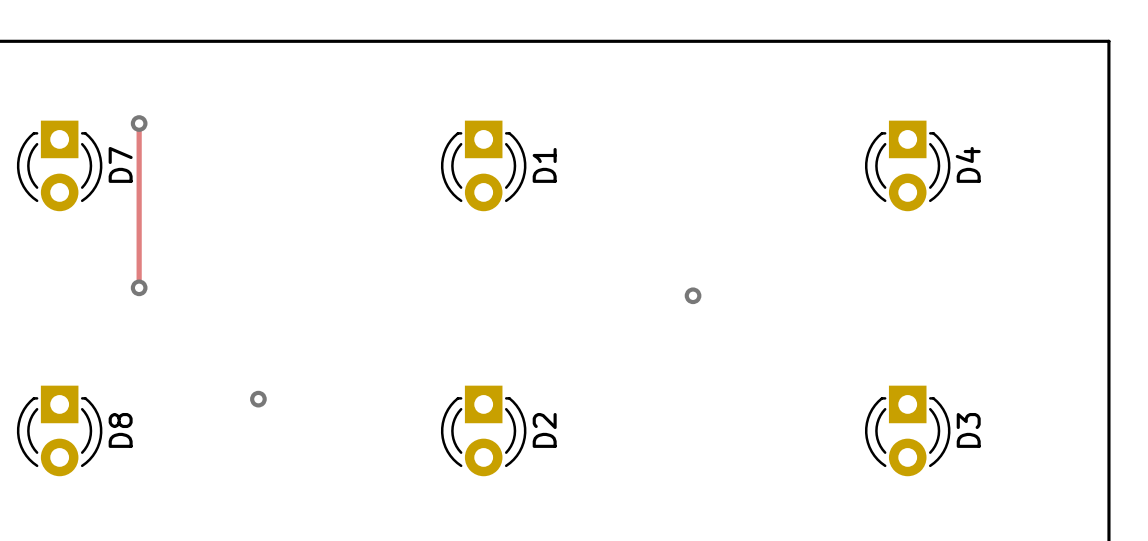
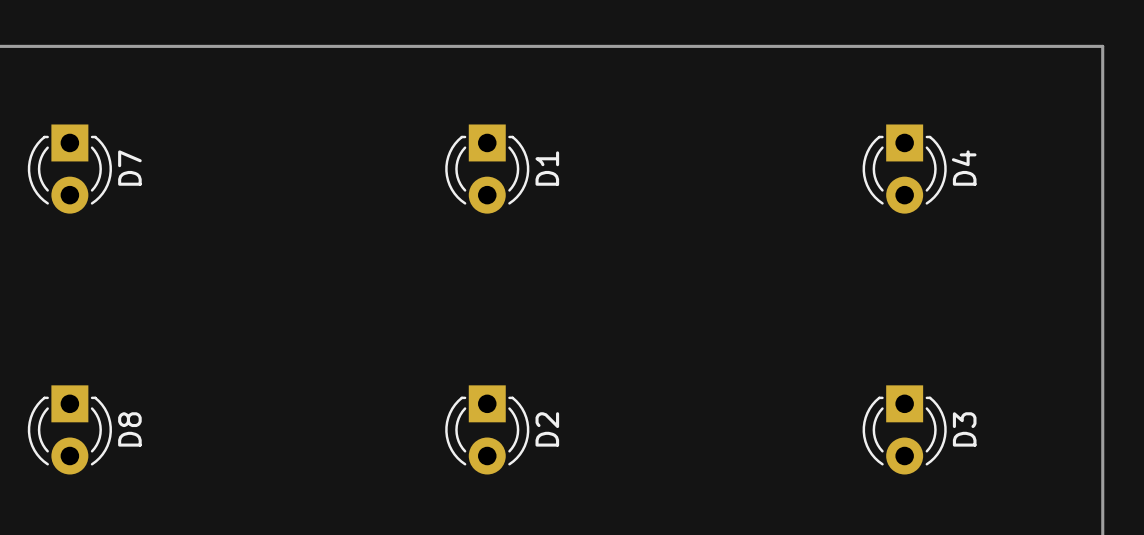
track: (139, 123) (139, 287) -> none
via: (139, 123) -> none
via: (139, 287) -> none
via: (693, 295) -> none
via: (258, 399) -> none

